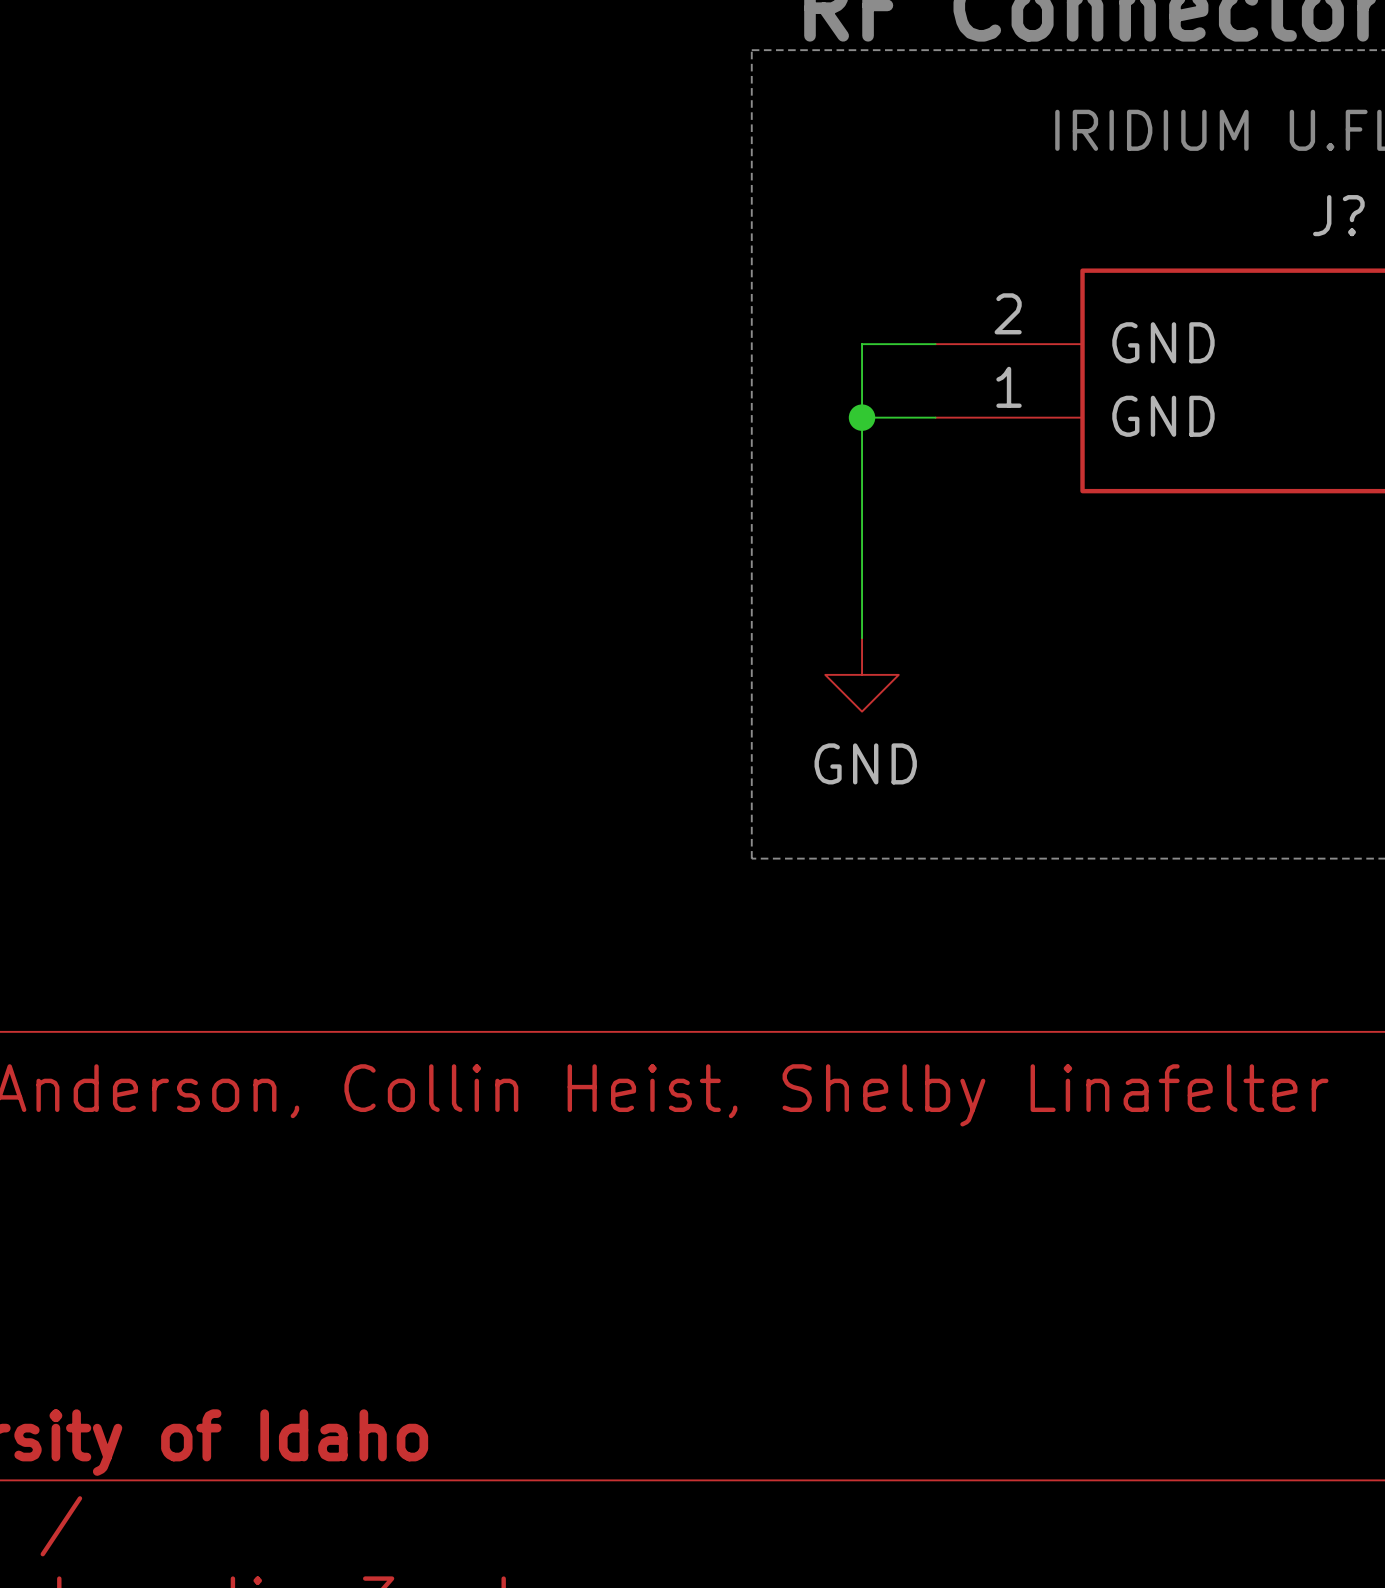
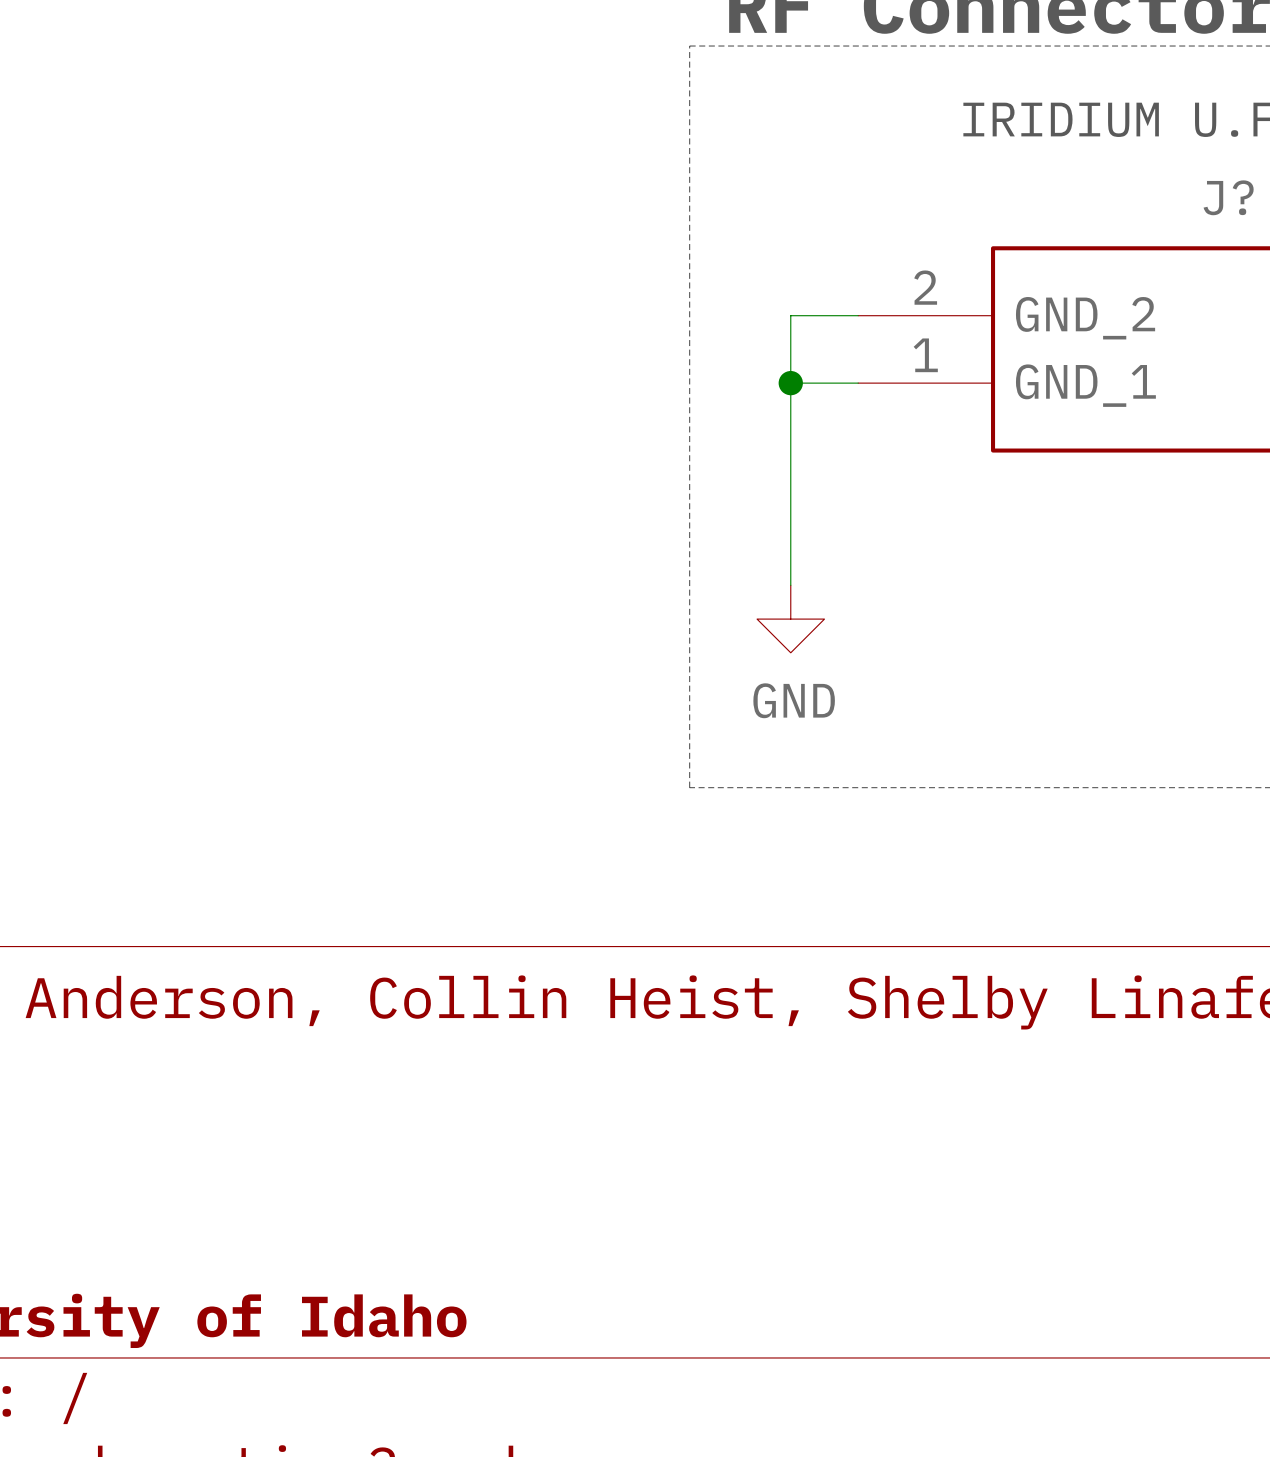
J? pin name: GND (1163, 342) -> GND_2 (1085, 318)
J? pin name: GND (1163, 416) -> GND_1 (1085, 385)

